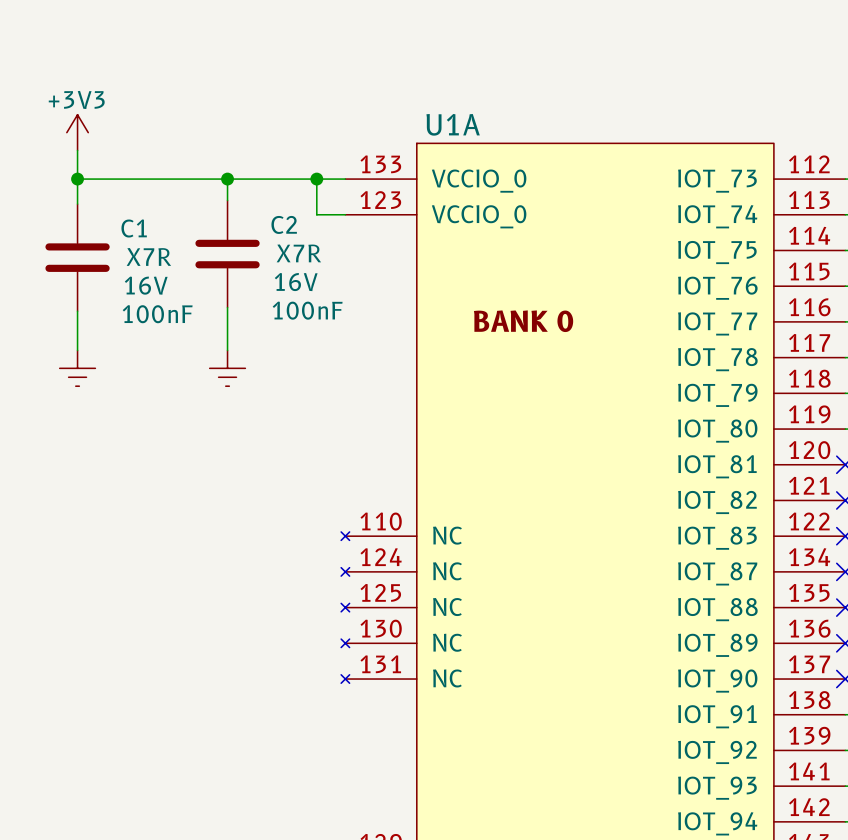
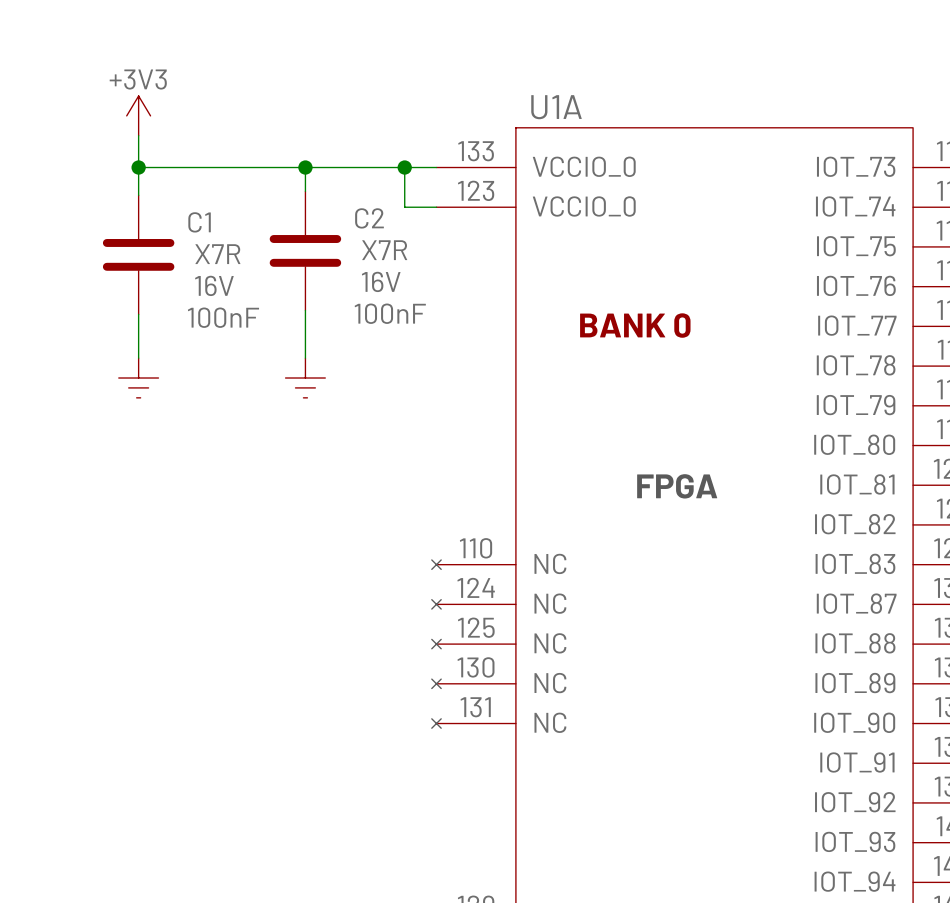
text: none -> FPGA (677, 486)

